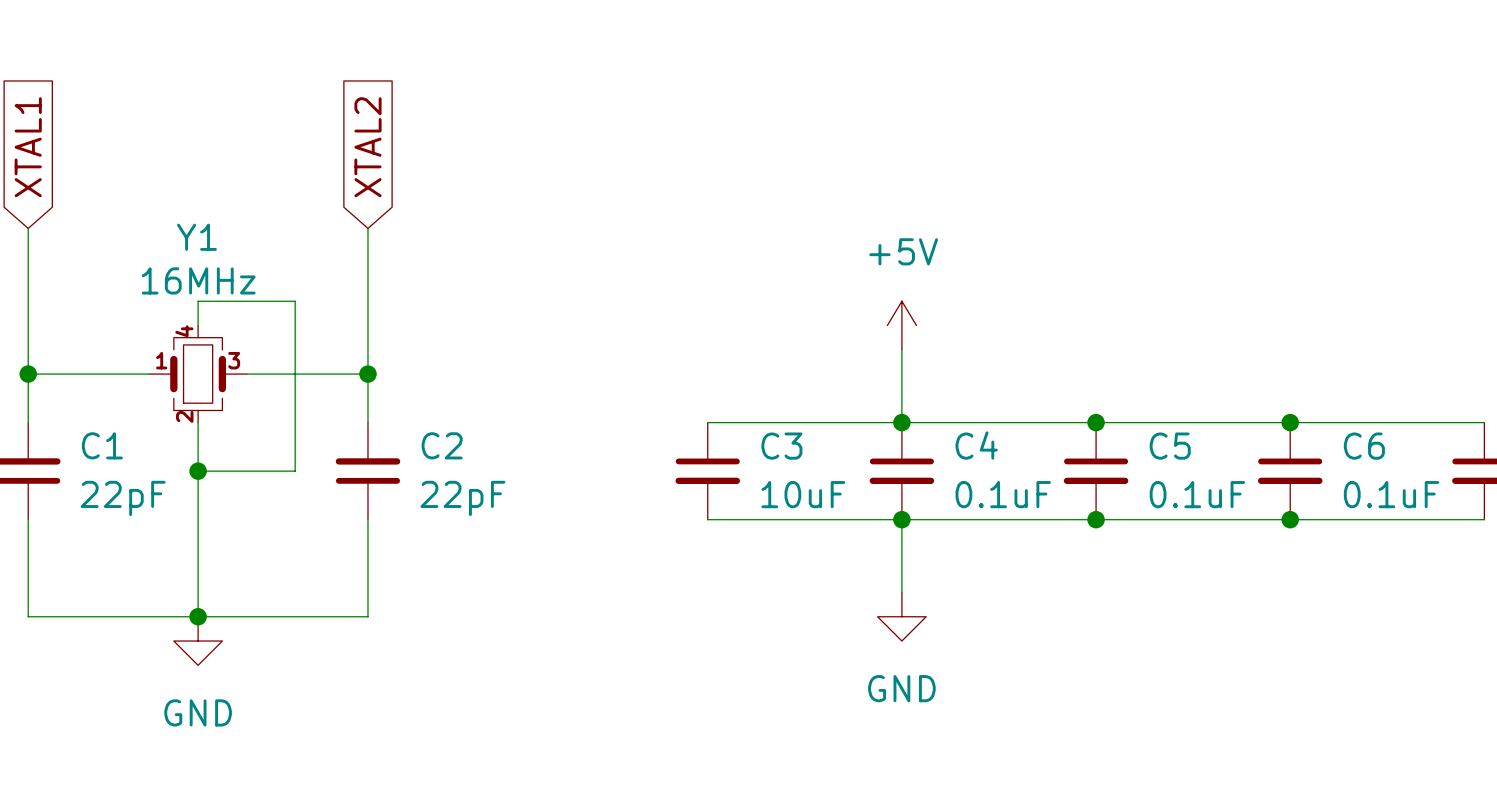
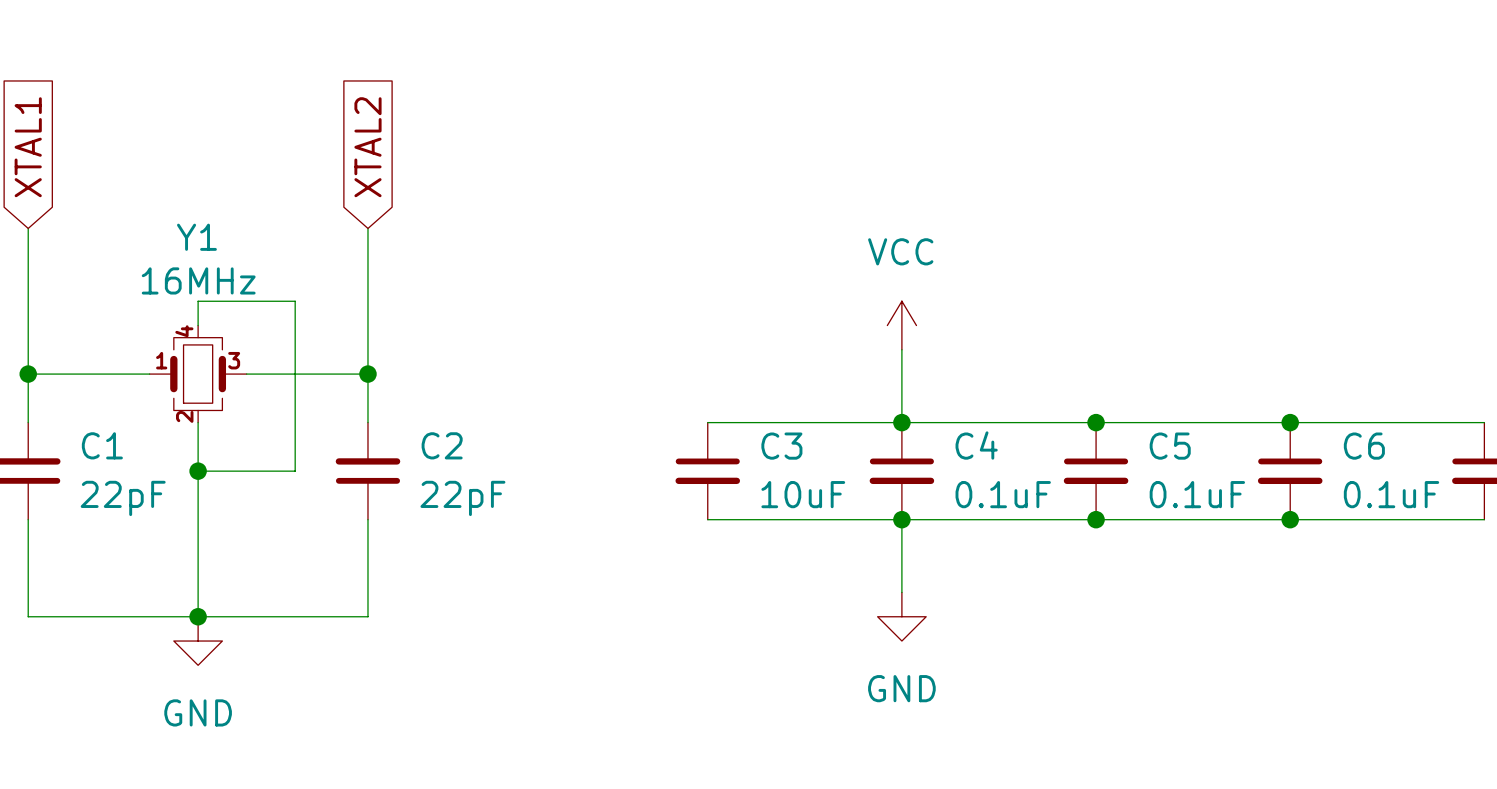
power symbol: +5V (901, 325) -> VCC (901, 325)

